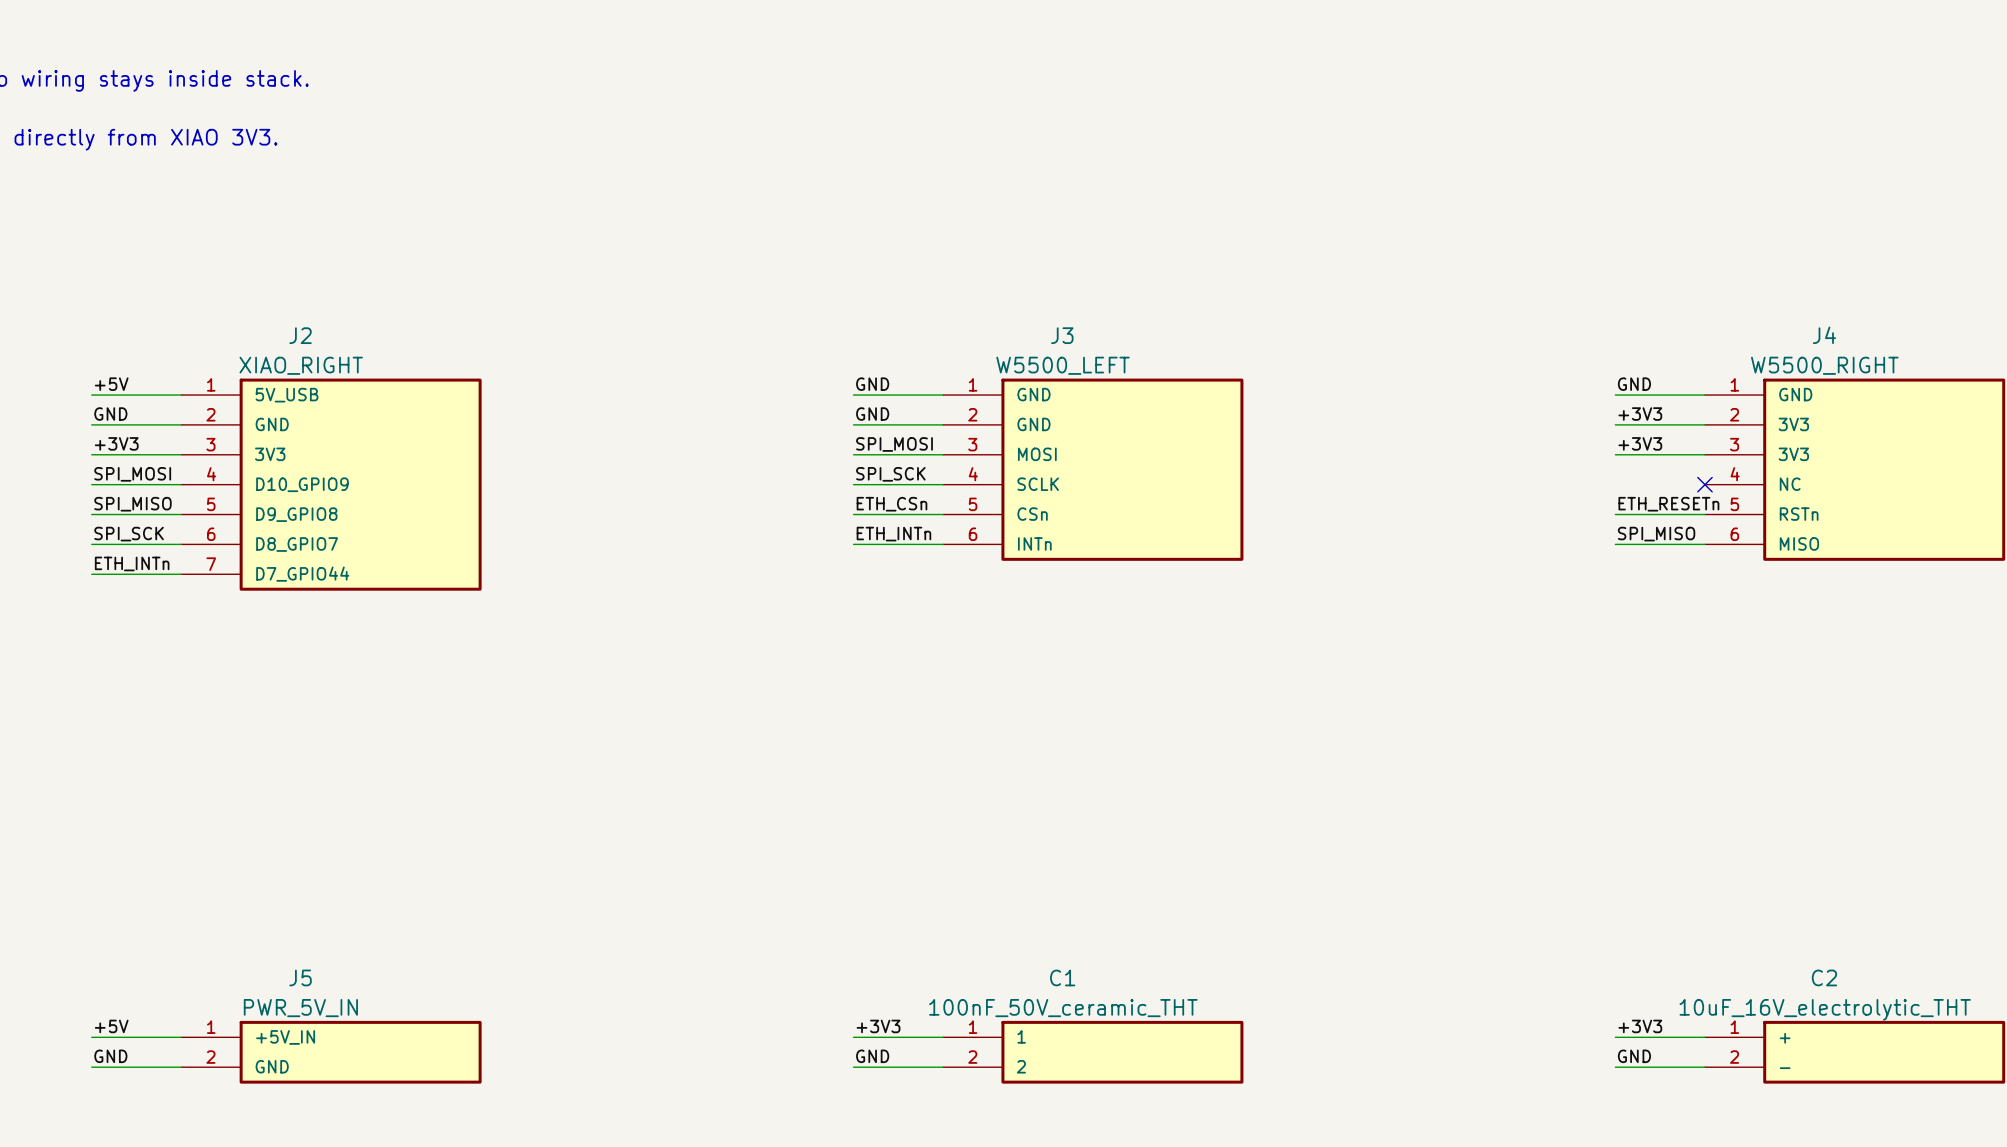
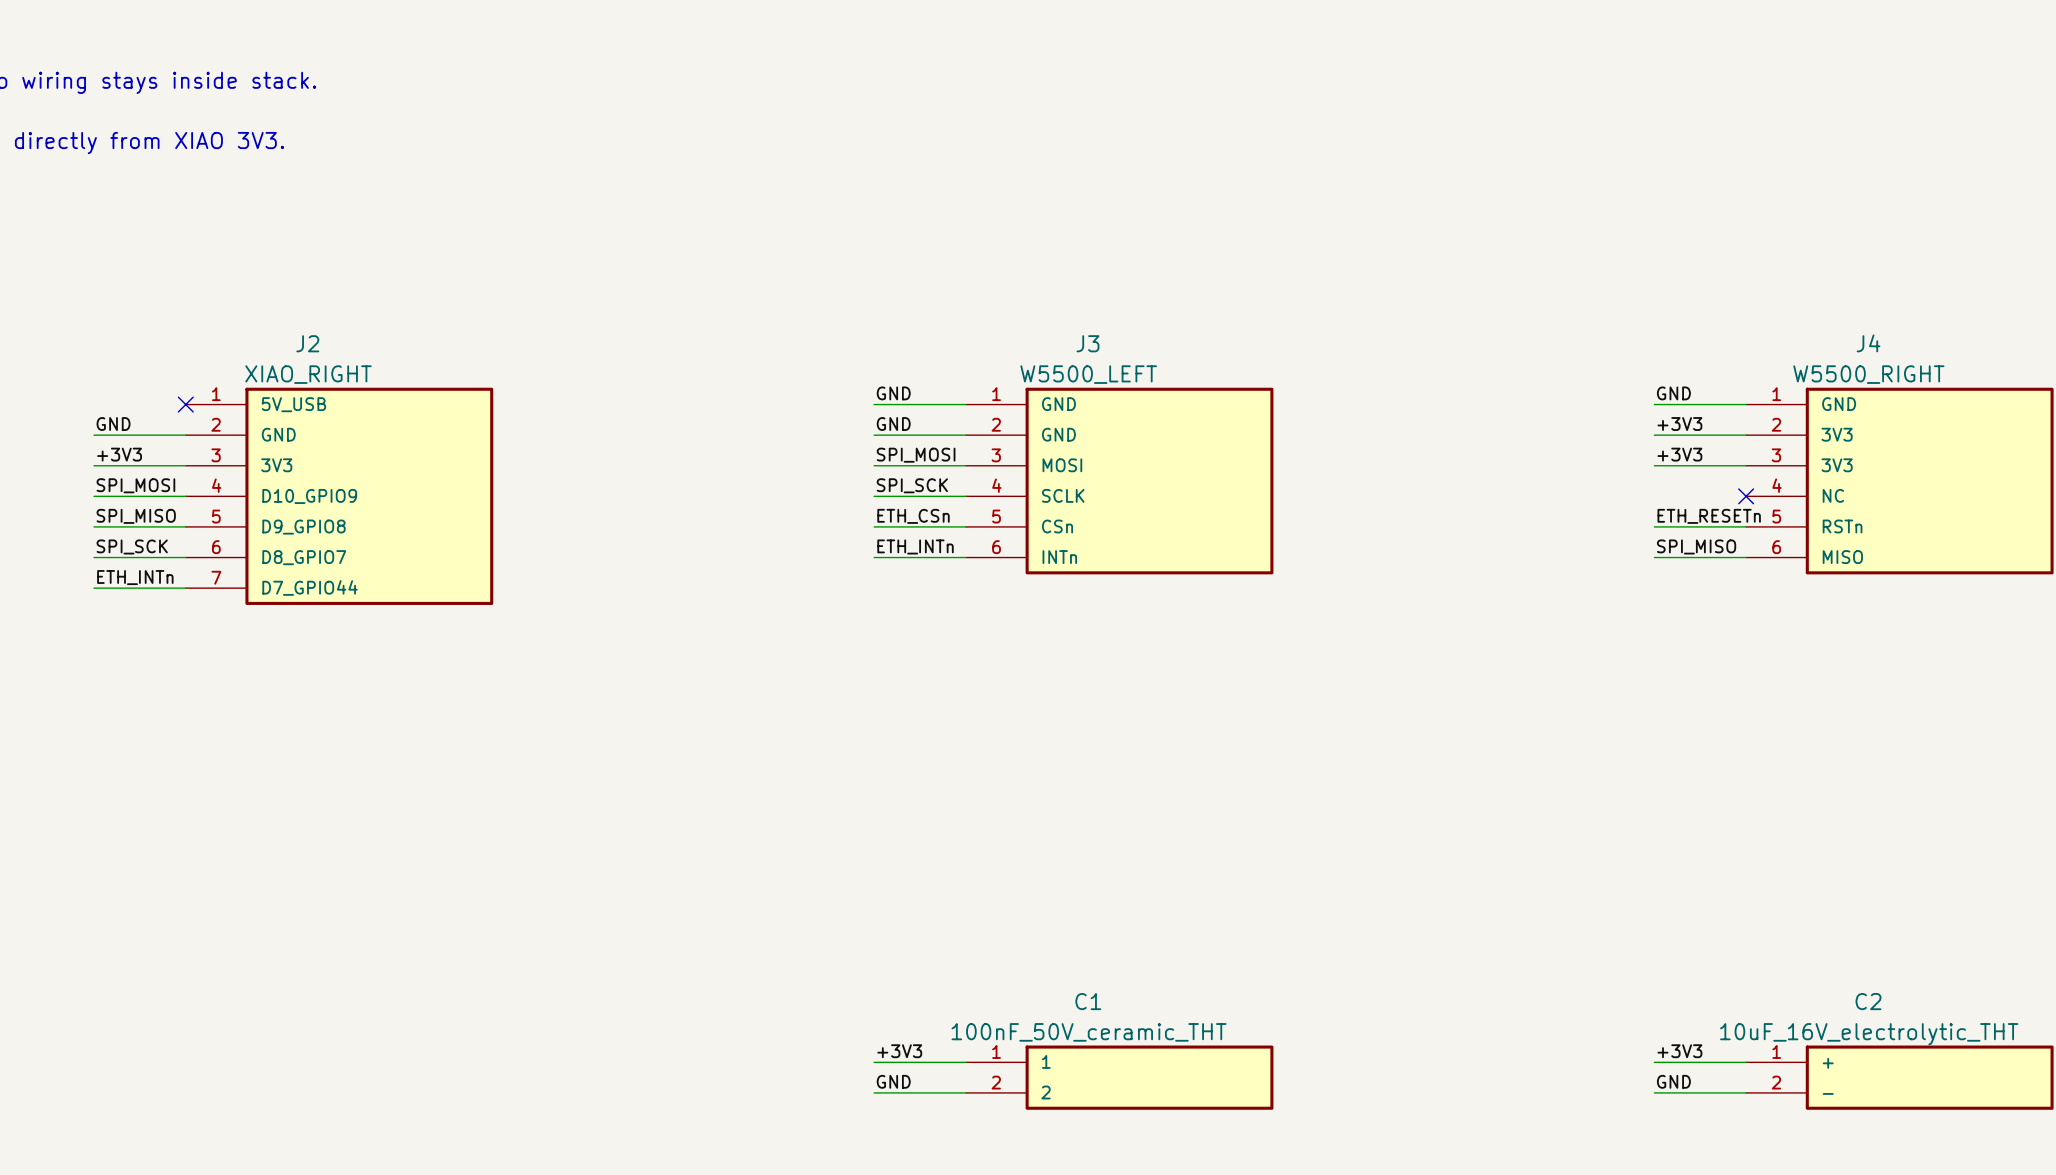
label: +5V (111, 384) -> none
wire: (91, 395) (181, 395) -> none
no-connect mark: none -> (185, 404)
label: +5V (111, 1026) -> none
wire: (91, 1037) (181, 1037) -> none
J5: PWR_5V_IN (331, 1052) -> none
label: GND (110, 1056) -> none
wire: (91, 1067) (181, 1067) -> none

